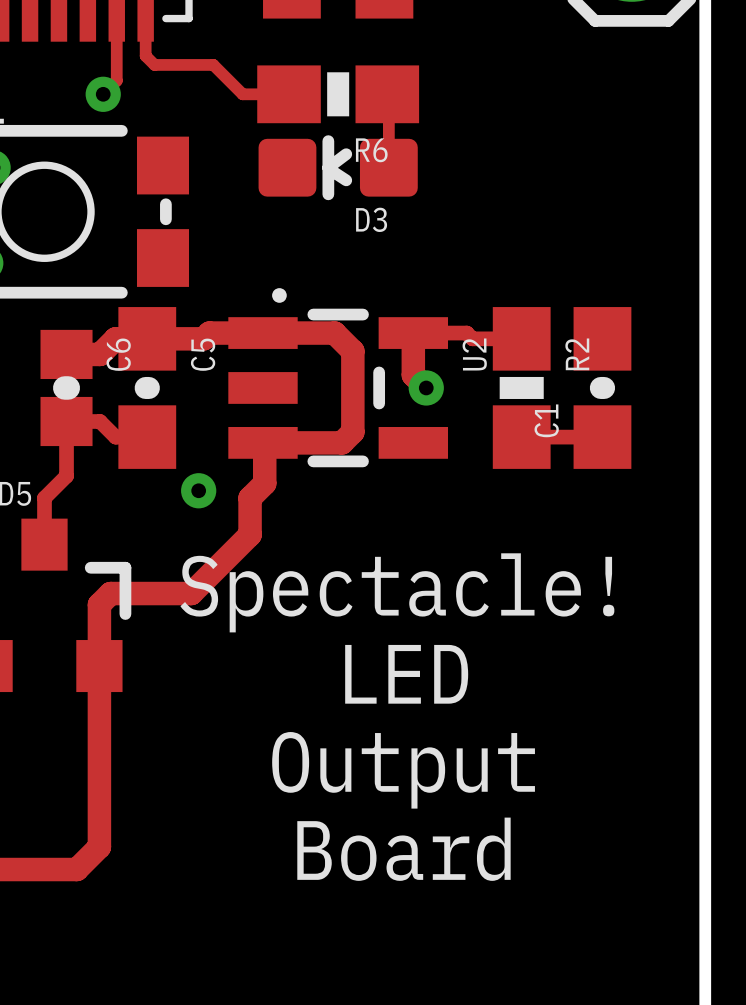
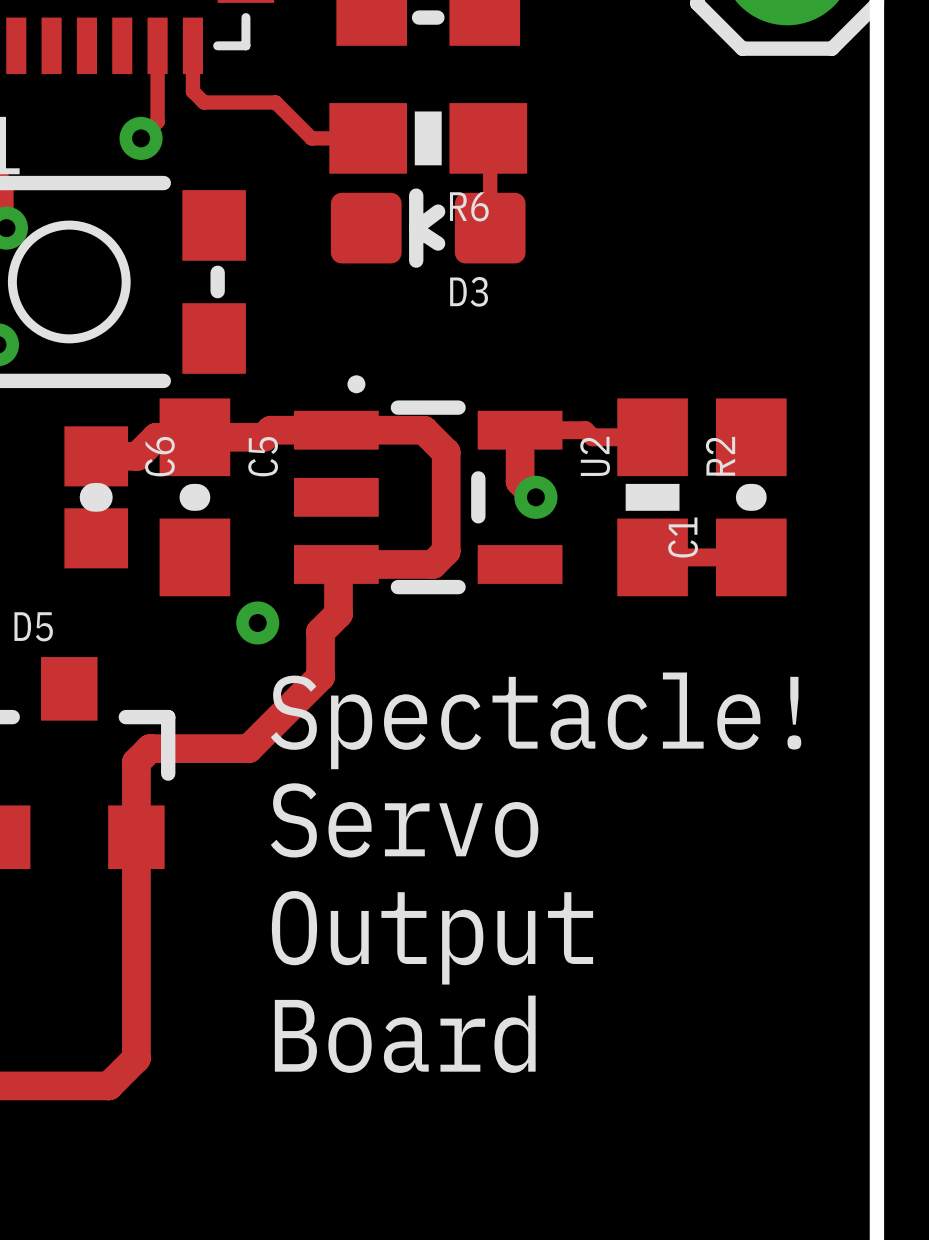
track: (147, 437) (115, 437) (100, 421) (66, 421) (66, 476) (44, 498) (44, 544) -> none
text position: Spectacle! (397, 592) -> Spectacle! (536, 720)
text: none -> Servo (404, 820)
text: LED (406, 674) -> none
text position: Output (403, 770) -> Output (432, 937)
text position: Board (403, 849) -> Board (405, 1034)

